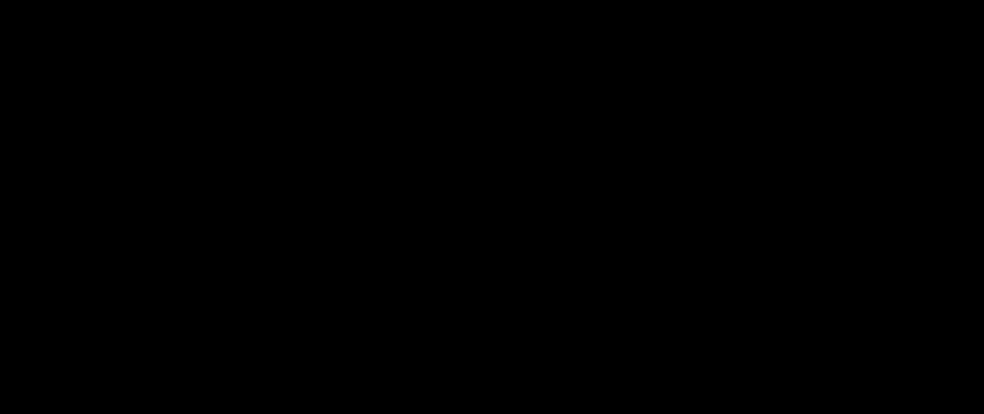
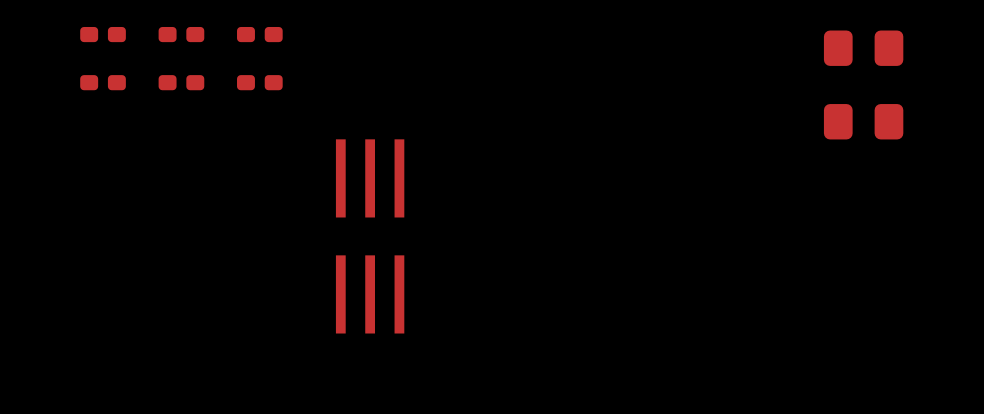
part: none -> (103, 34)
part: none -> (181, 34)
part: none -> (259, 34)
part: none -> (863, 48)
part: none -> (103, 82)
part: none -> (181, 82)
part: none -> (259, 82)
part: none -> (863, 121)
part: none -> (370, 178)
part: none -> (370, 294)

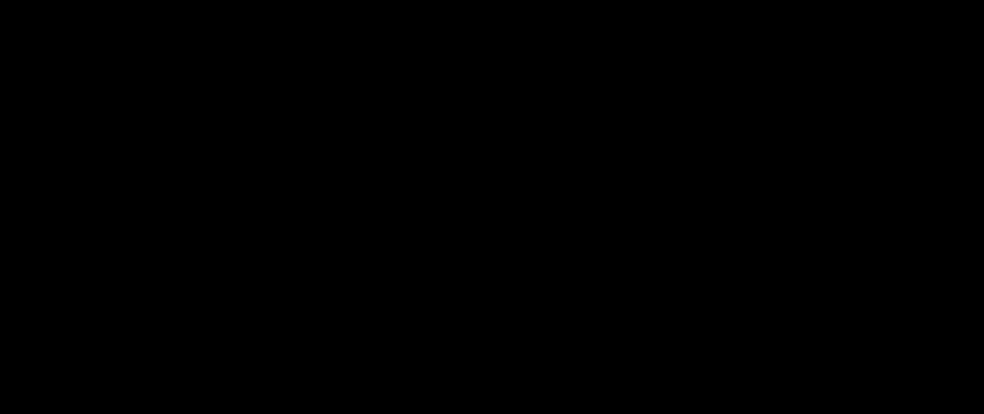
part: (103, 34) -> none
part: (181, 34) -> none
part: (259, 34) -> none
part: (863, 48) -> none
part: (103, 82) -> none
part: (181, 82) -> none
part: (259, 82) -> none
part: (863, 121) -> none
part: (370, 178) -> none
part: (370, 294) -> none

